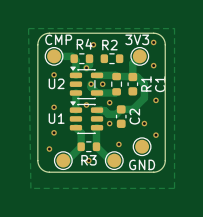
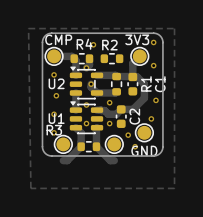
board edge: (51, 33) (42, 35) (37, 44) (37, 162) (42, 169) (49, 172) (153, 172) (162, 167) (165, 160) (165, 43) (160, 35) (153, 33) -> (51, 33) (45, 35) (42, 42) (42, 147) (45, 153) (51, 155) (153, 155) (160, 152) (162, 146) (162, 41) (159, 35) (153, 33)
via: (102, 84) -> none
via: none -> (56, 95)
via: (54, 107) -> none
via: none -> (54, 114)
via: none -> (151, 118)
via: none -> (86, 123)
via: (144, 123) -> none
via: none -> (128, 135)
via: (155, 135) -> none
via: (118, 144) -> none
via: none -> (135, 146)
GND position: (142, 146) -> (144, 132)
via: (49, 149) -> none
part position: (63, 160) -> (63, 144)
via: (88, 160) -> none
R3 name position: R3 (89, 160) -> R3 (54, 130)
part position: (114, 160) -> (114, 144)

